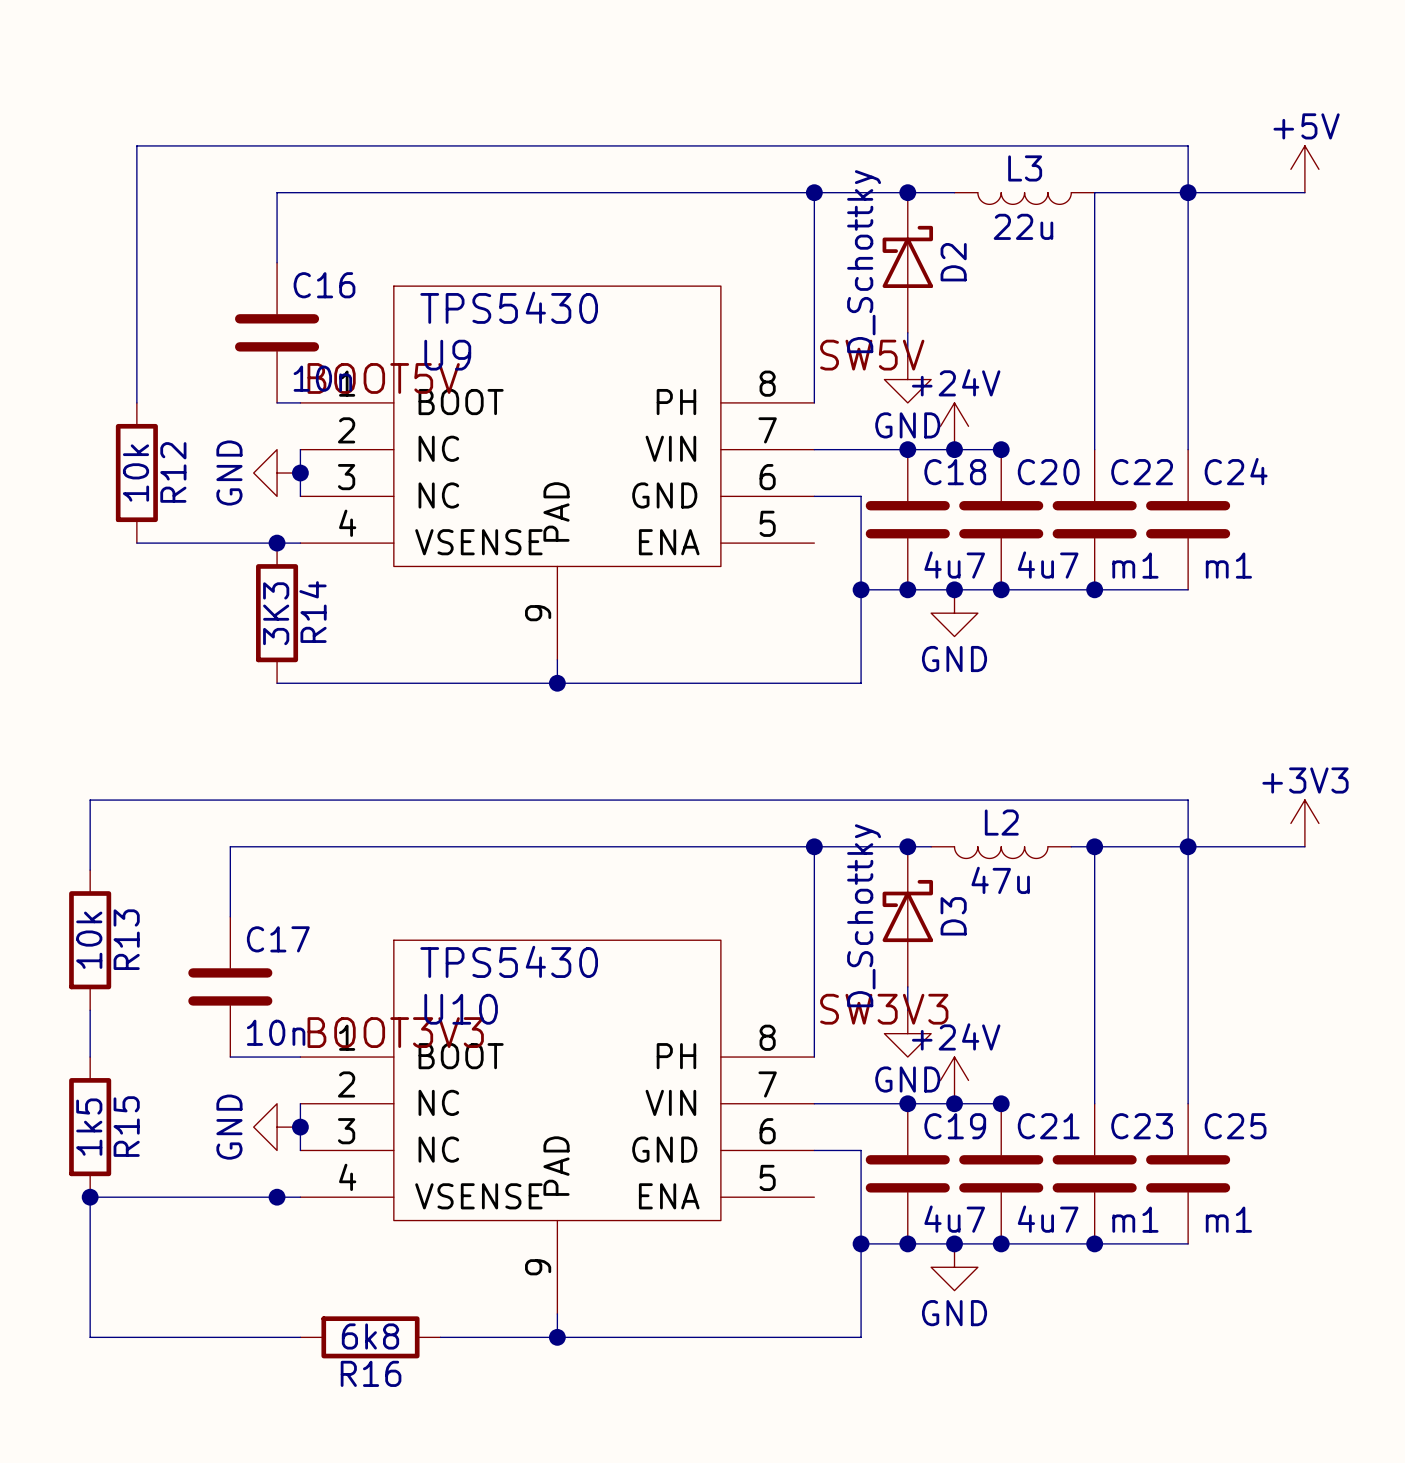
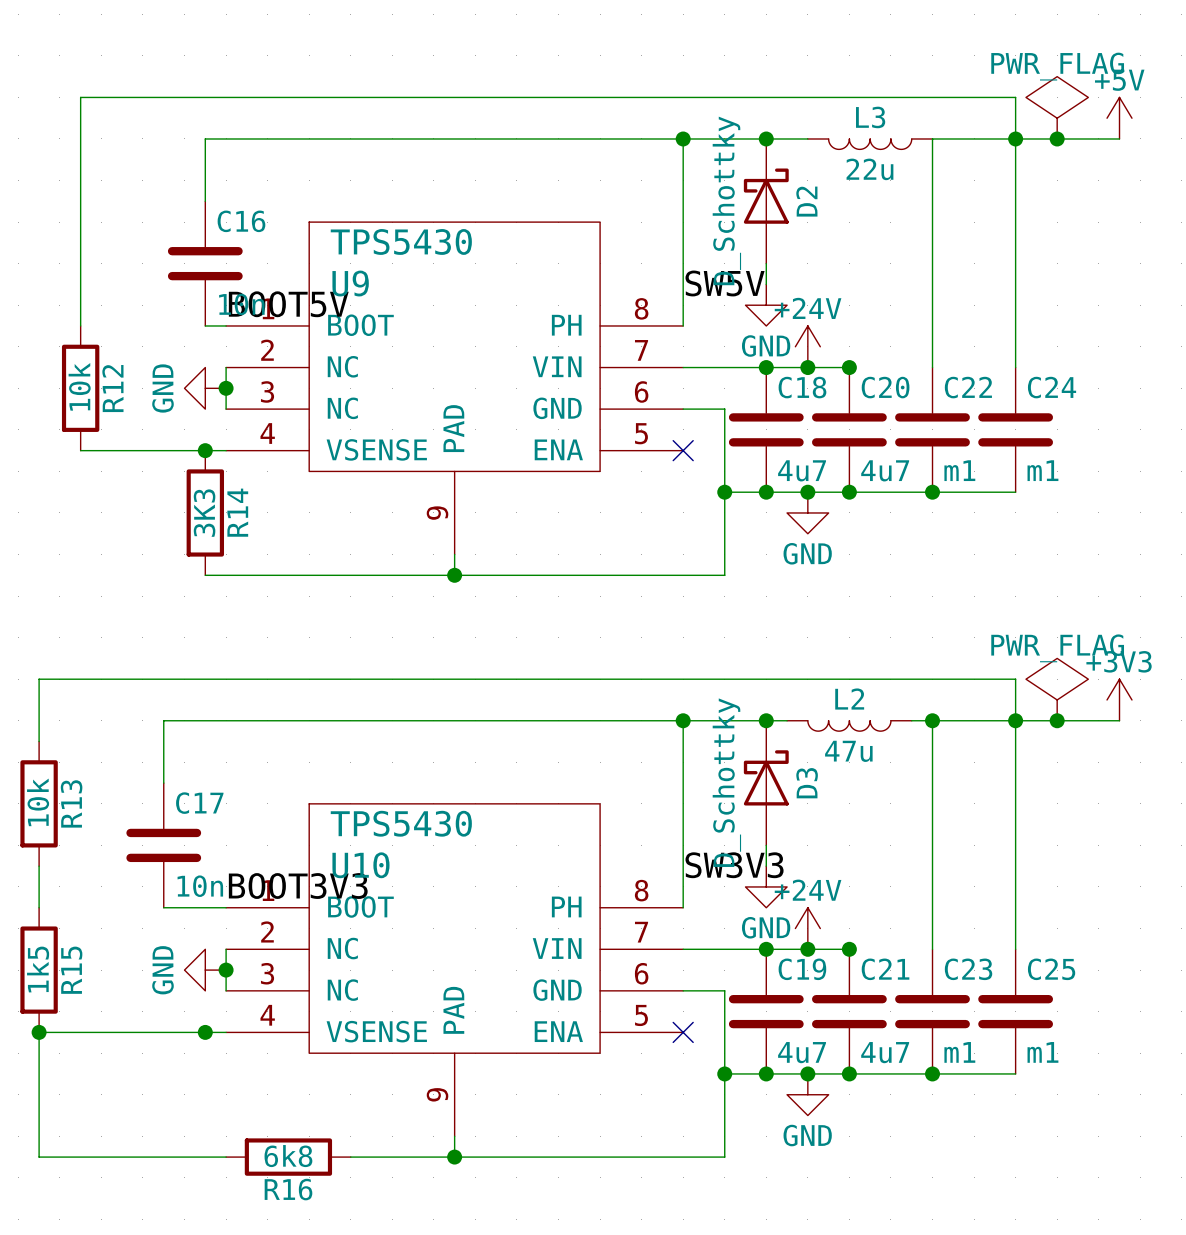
power symbol: none -> PWR_FLAG (1057, 107)
junction: none -> (1057, 138)
no-connect mark: none -> (683, 450)
power symbol: none -> PWR_FLAG (1057, 689)
junction: none -> (1057, 720)
no-connect mark: none -> (683, 1032)

